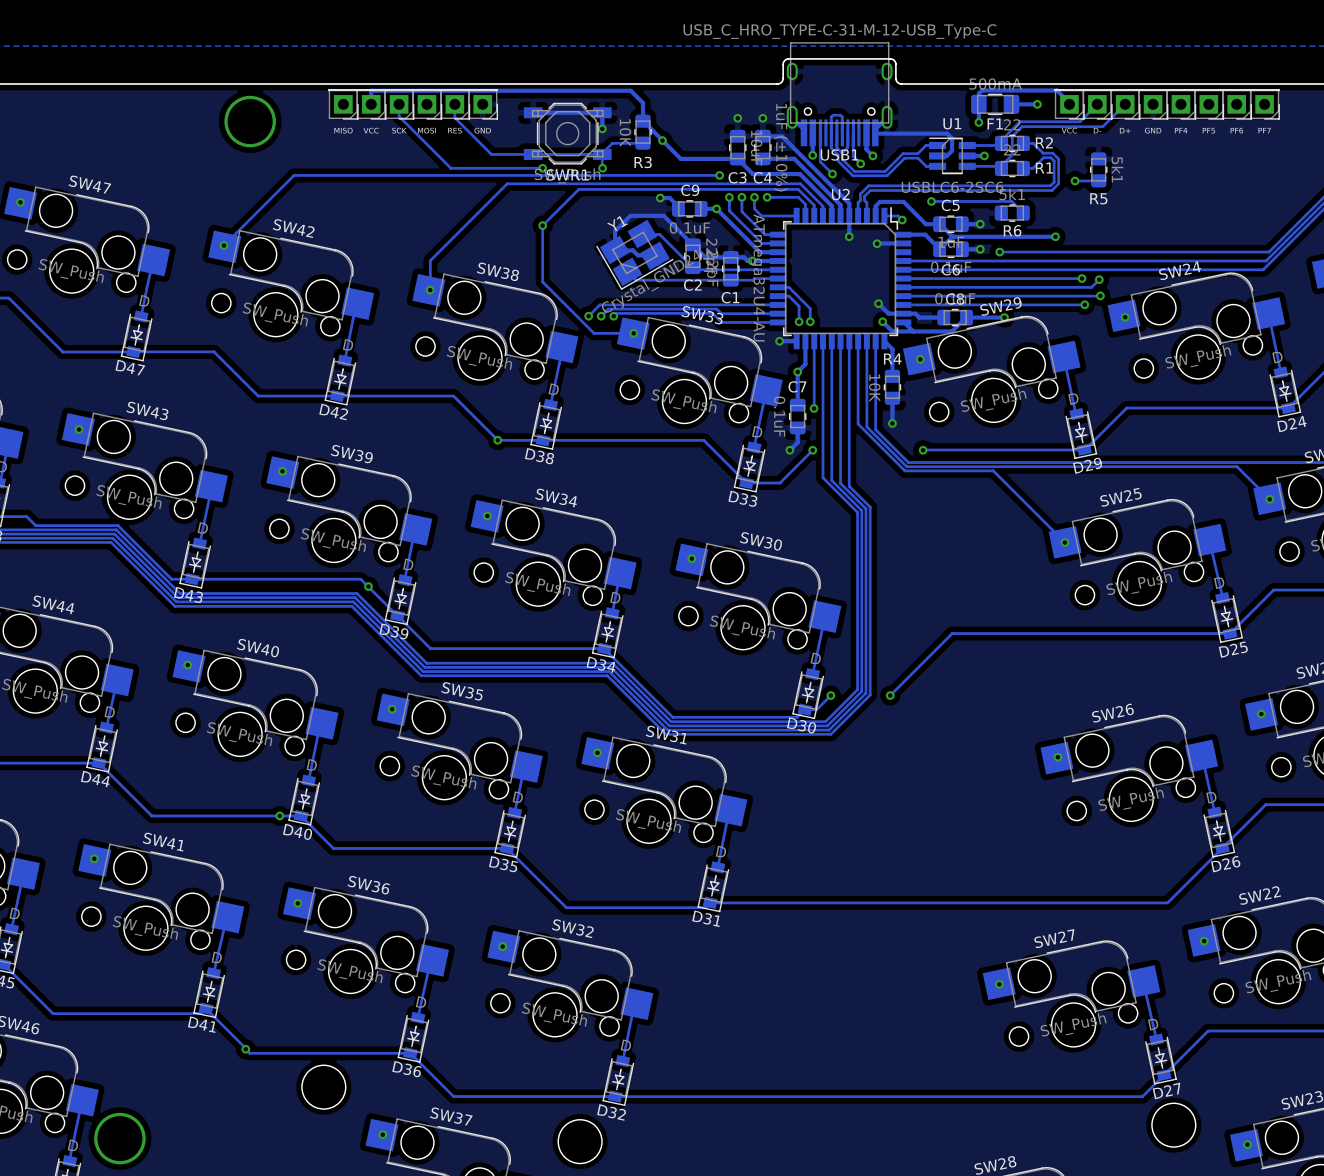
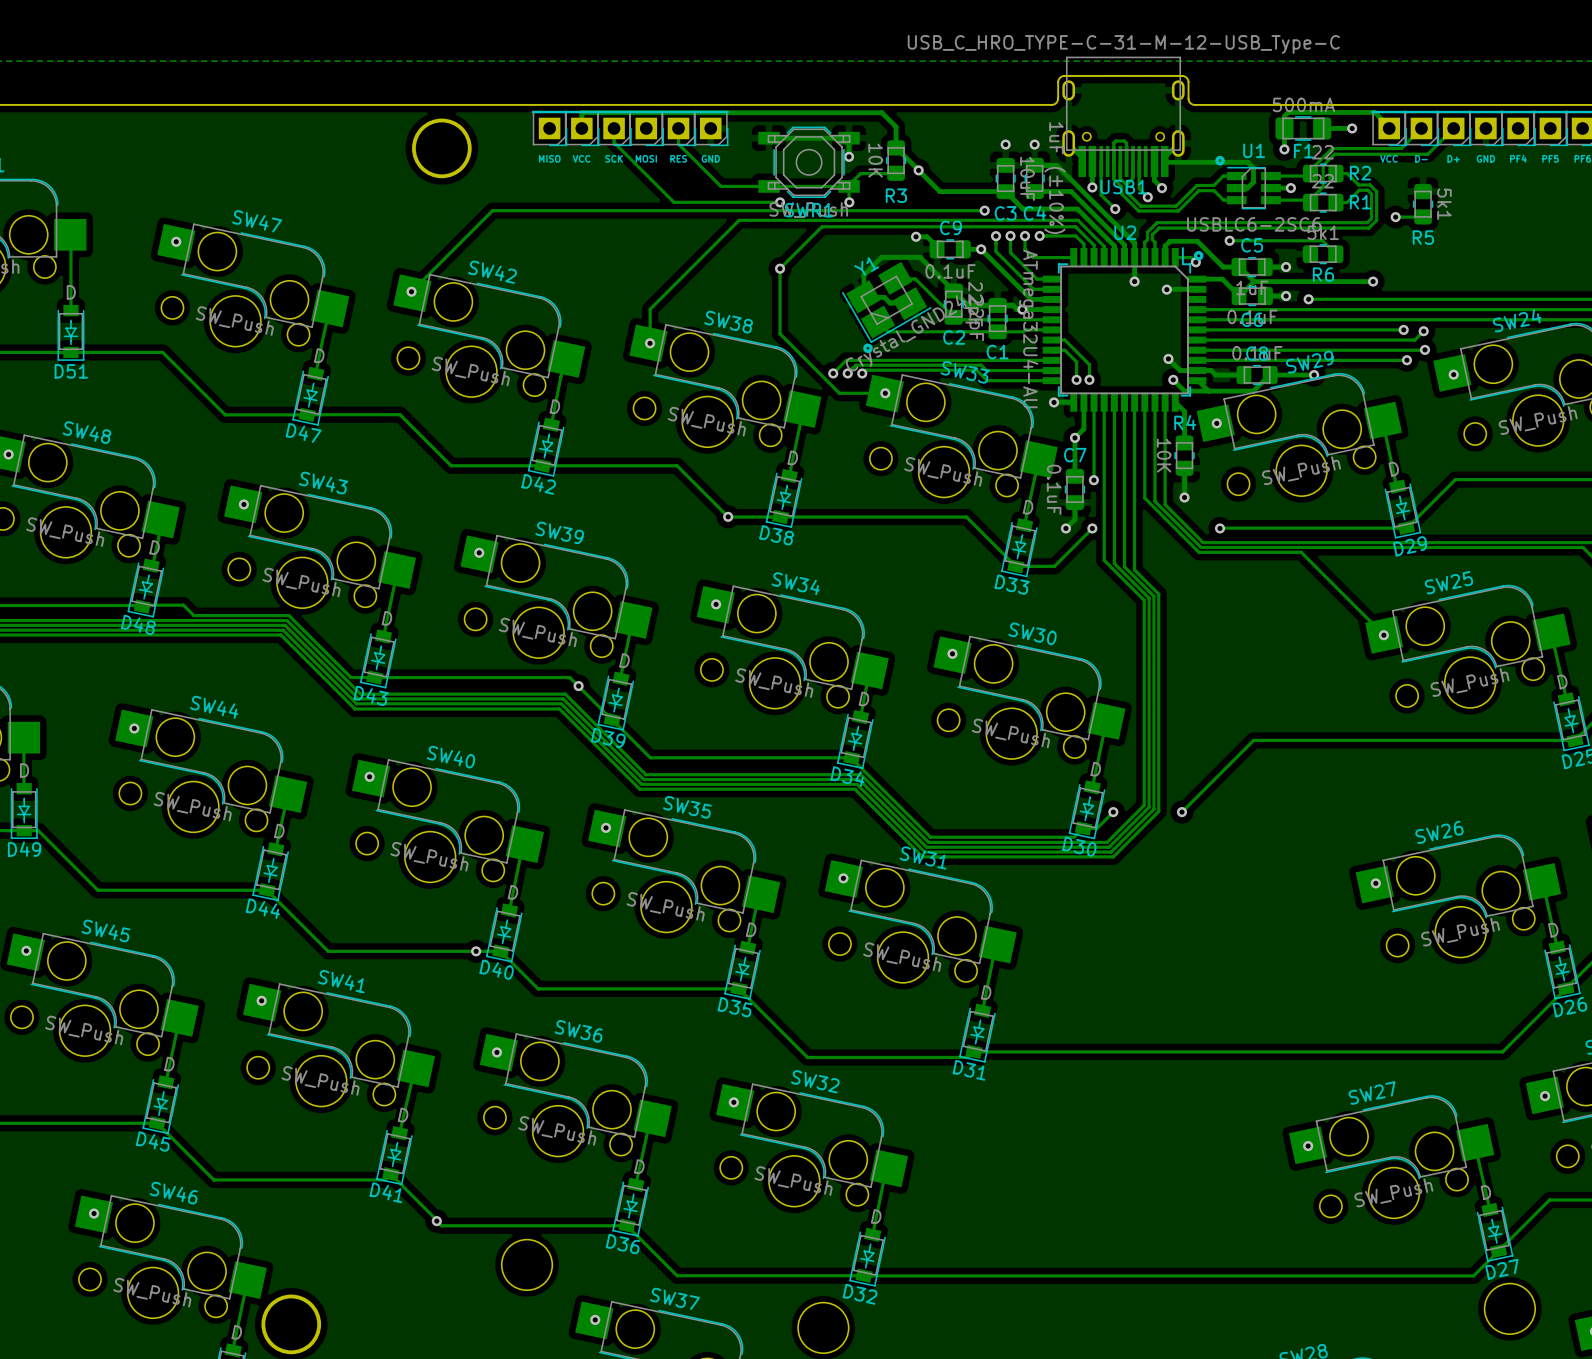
U1 footprint: [929, 137, 976, 175] -> [1215, 155, 1281, 210]
U2 footprint: [769, 206, 912, 350] -> [1042, 247, 1207, 412]
Y1 footprint: [596, 219, 674, 290] -> [842, 261, 932, 354]

